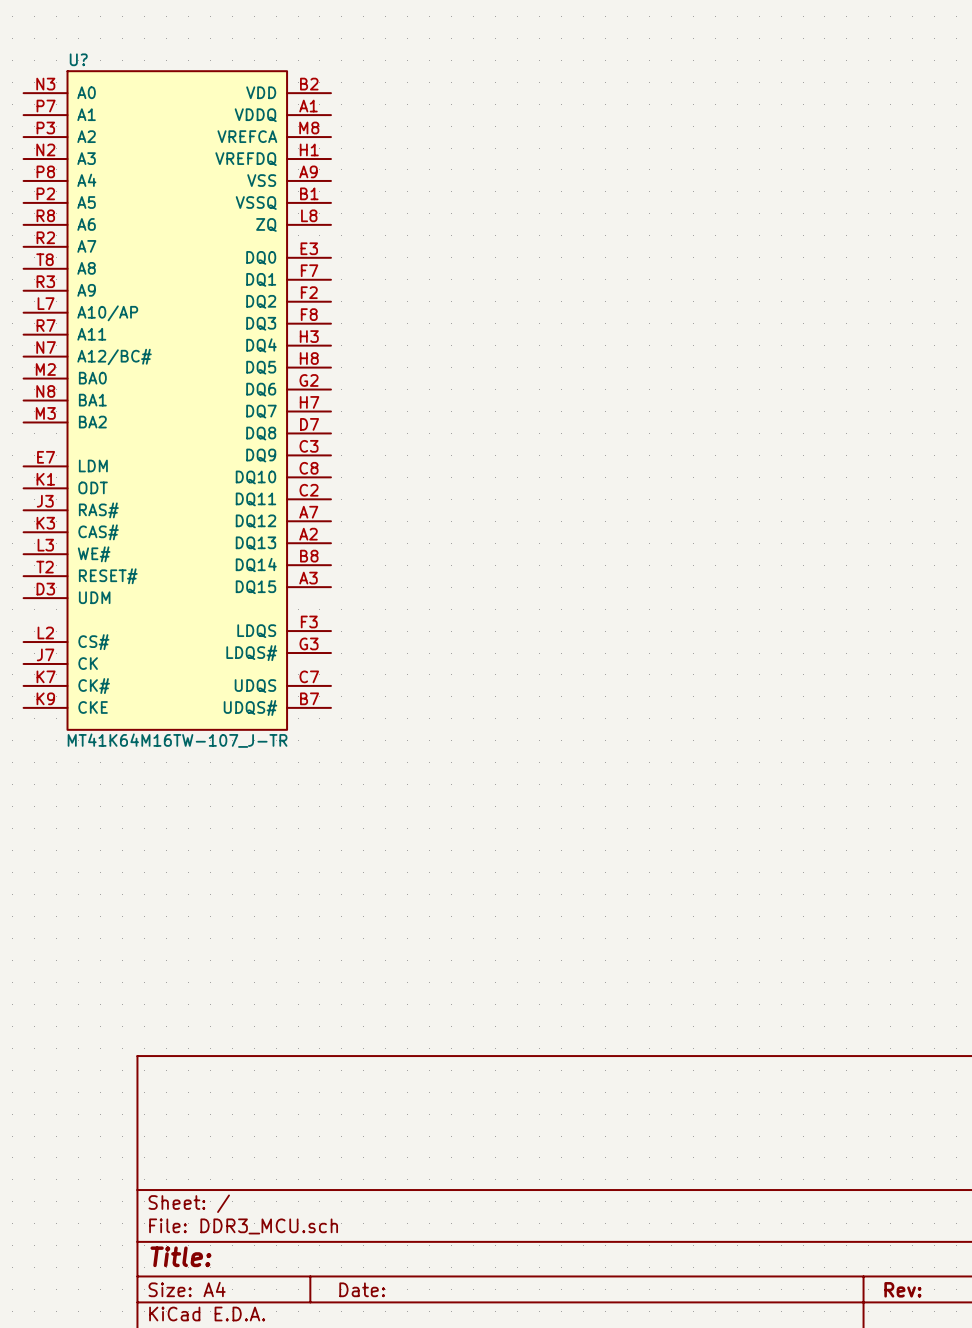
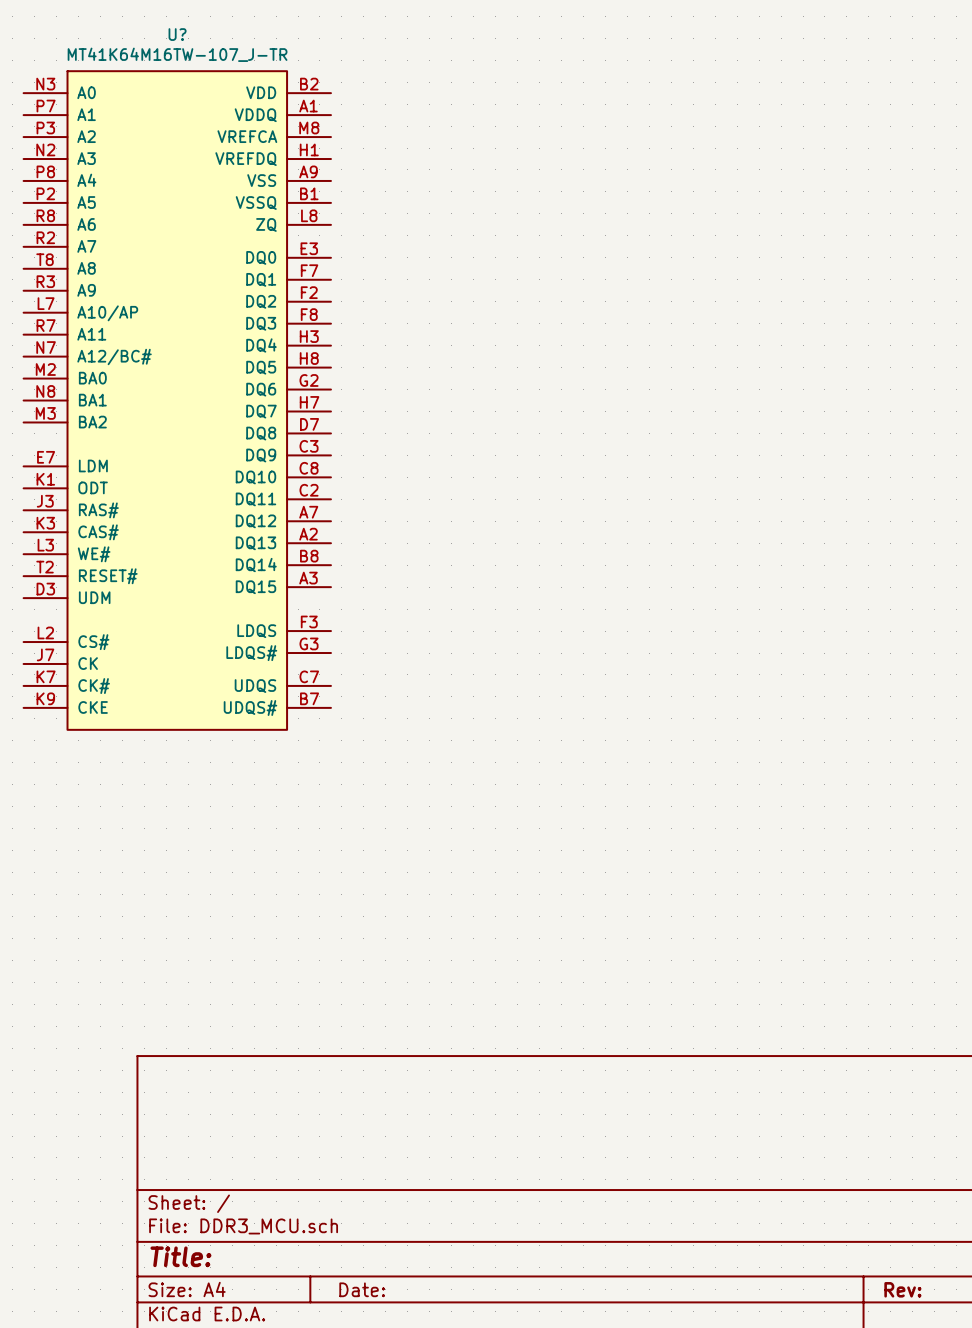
U? name position: U? (78, 59) -> U? (177, 34)
U? text position: MT41K64M16TW-107_J-TR (177, 740) -> MT41K64M16TW-107_J-TR (177, 54)

